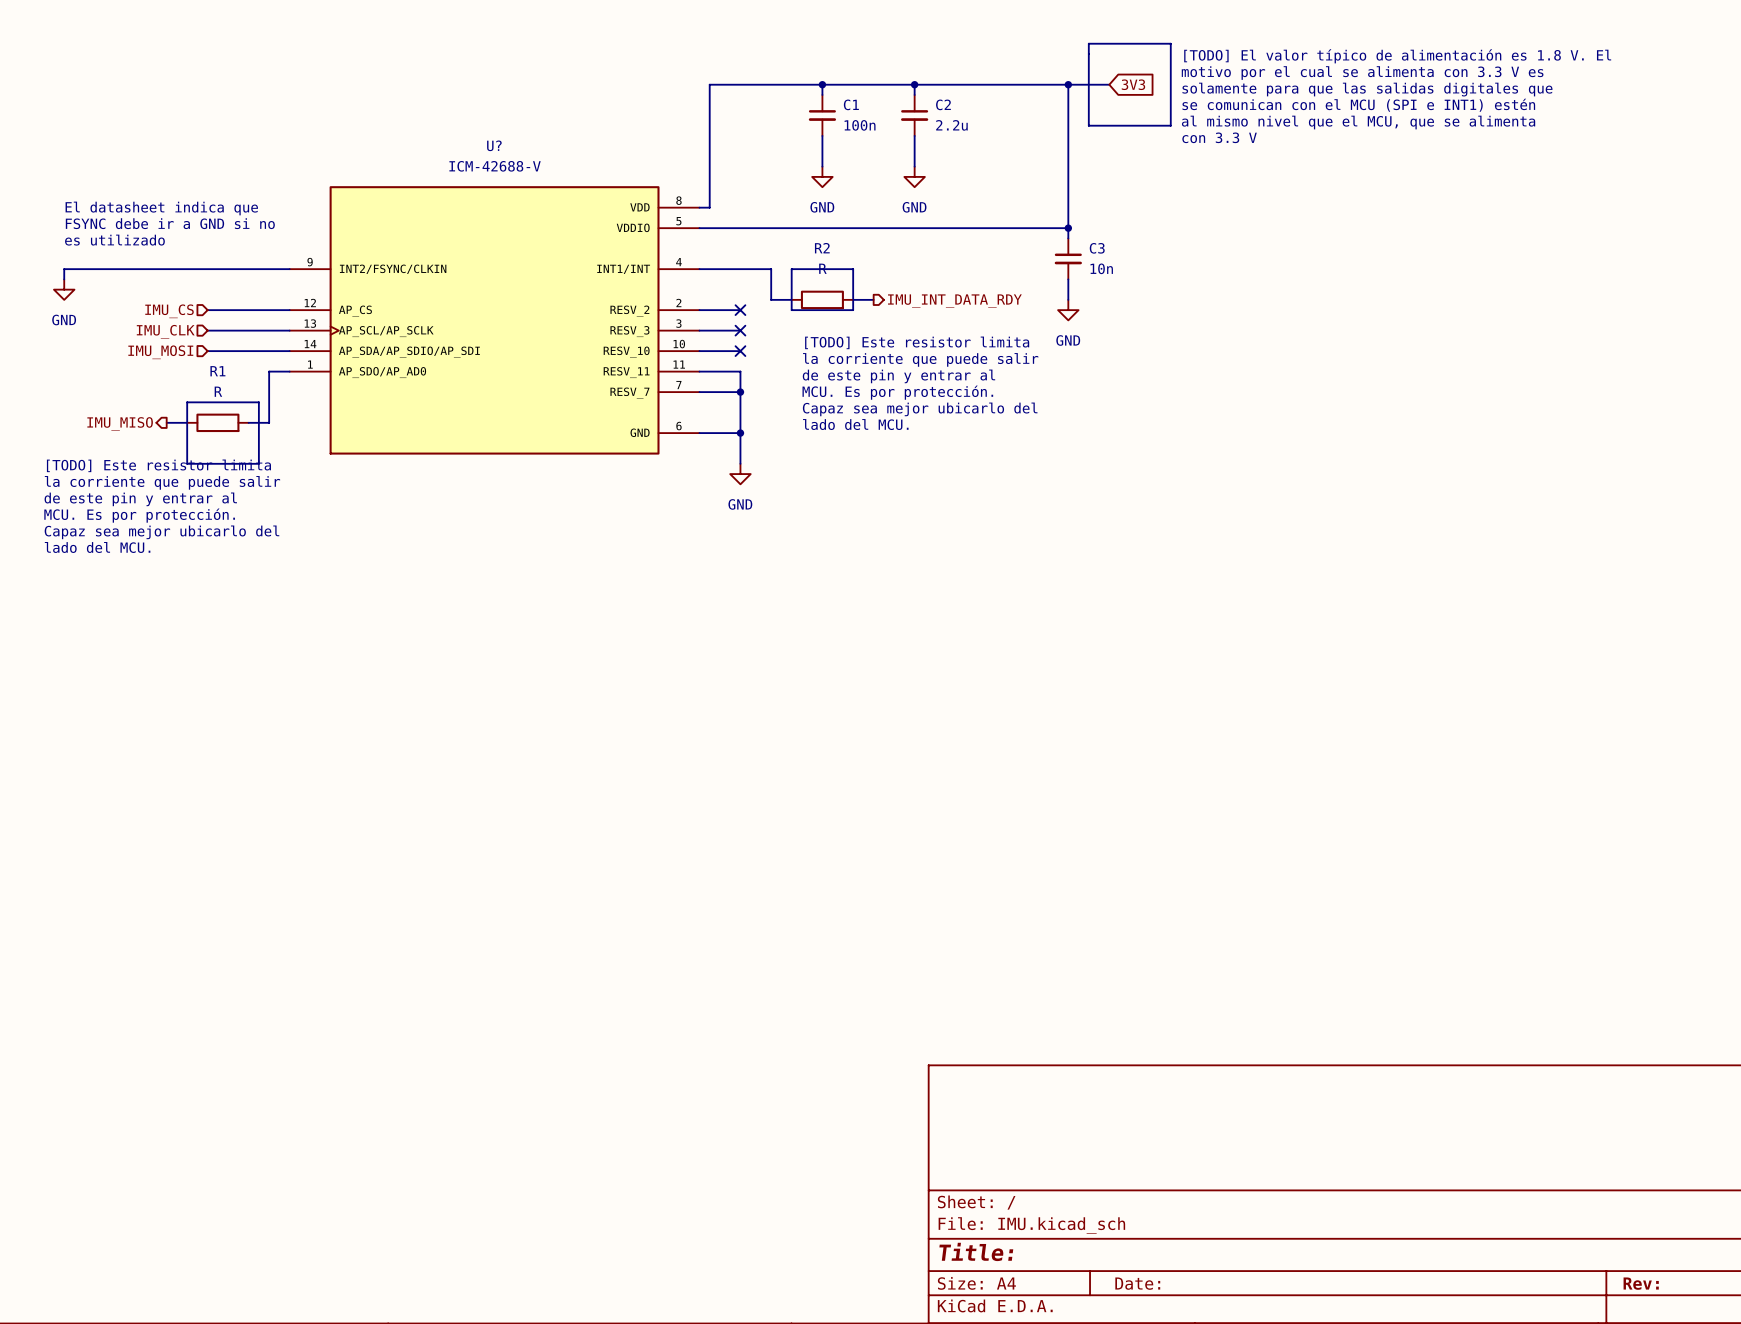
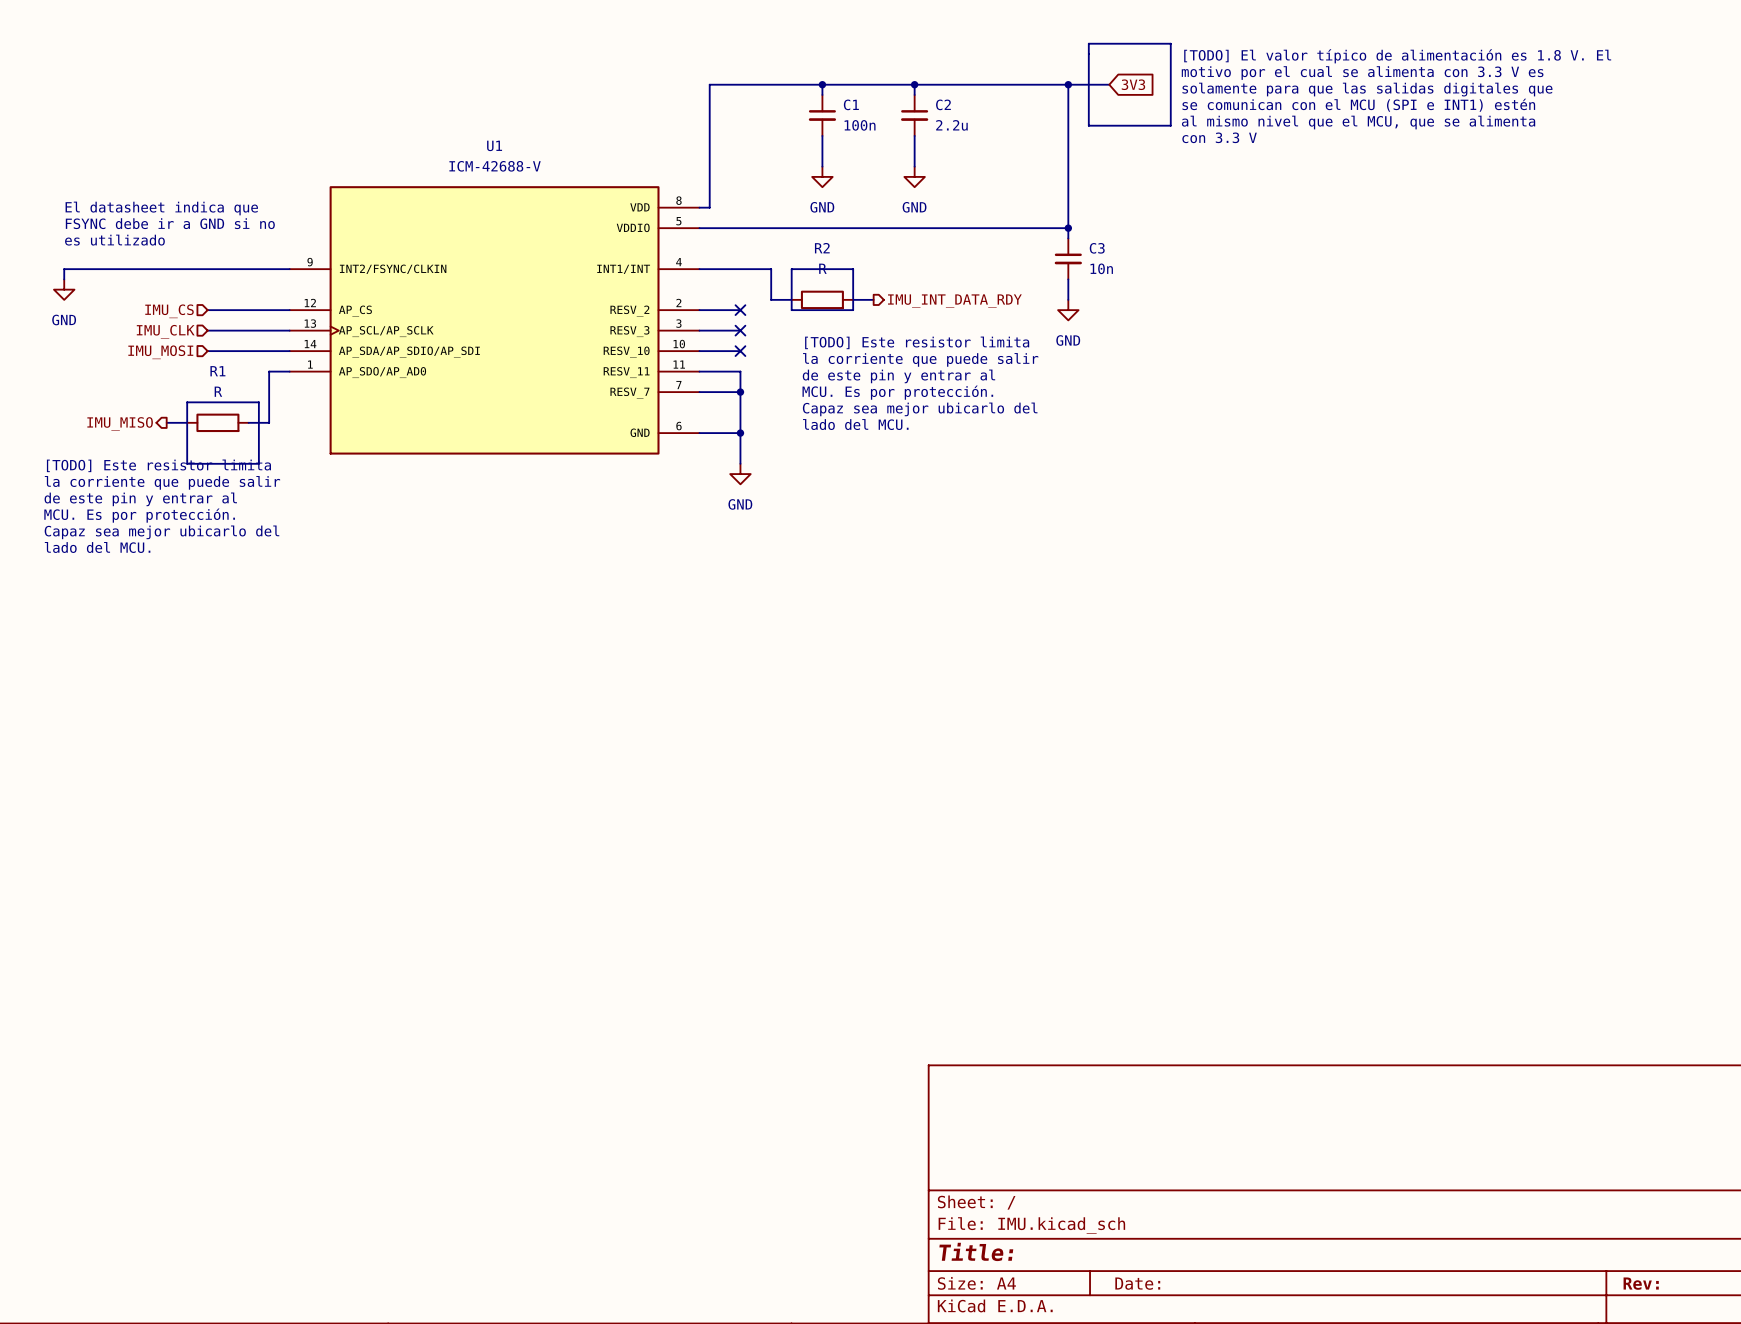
U? name: U? (494, 145) -> U1 (494, 145)

